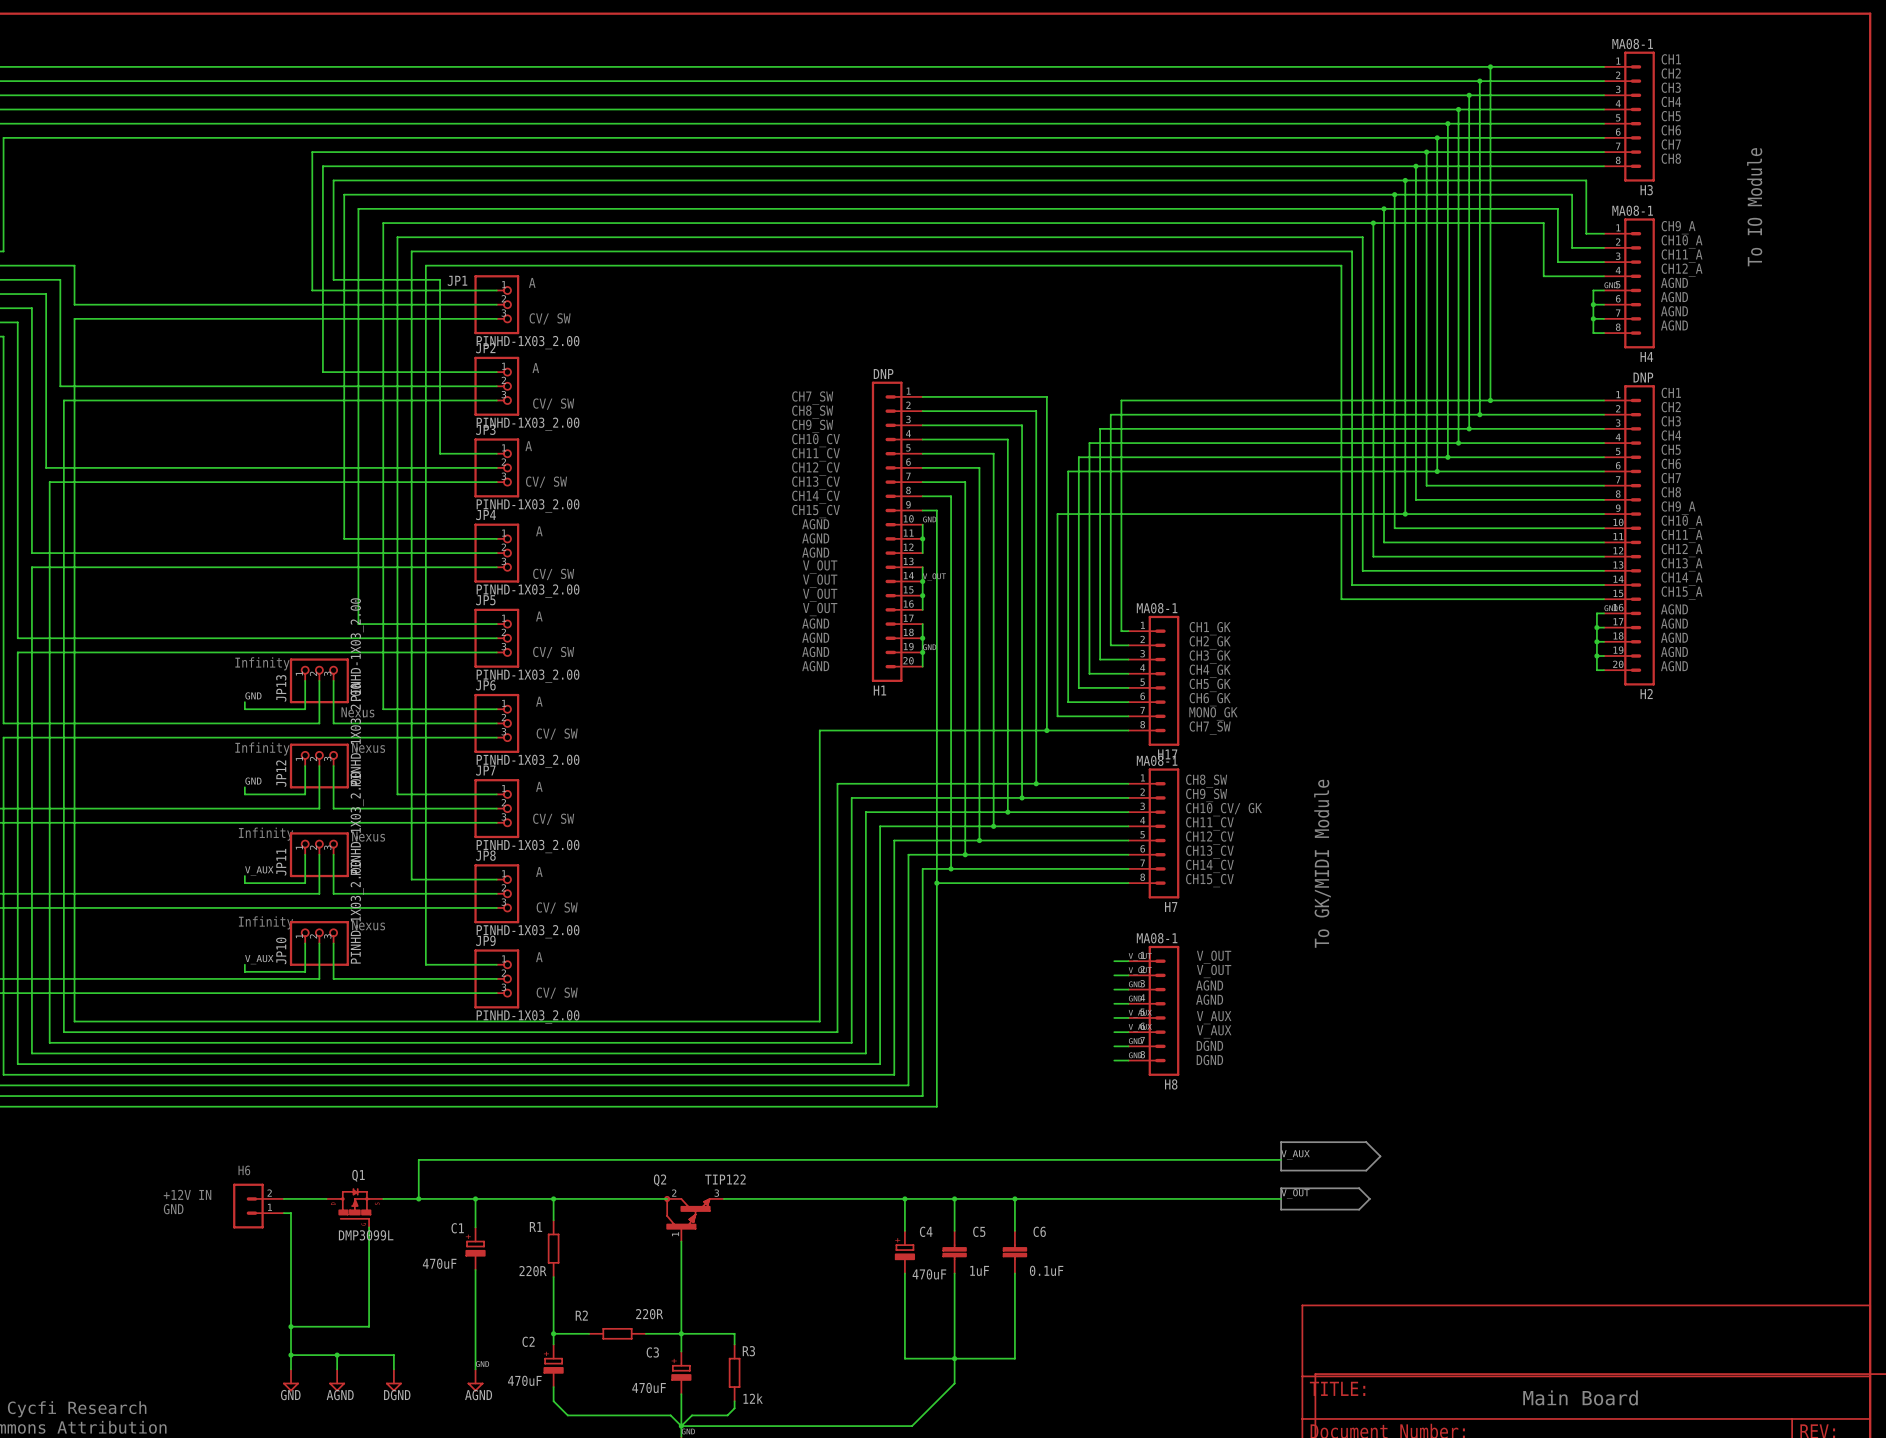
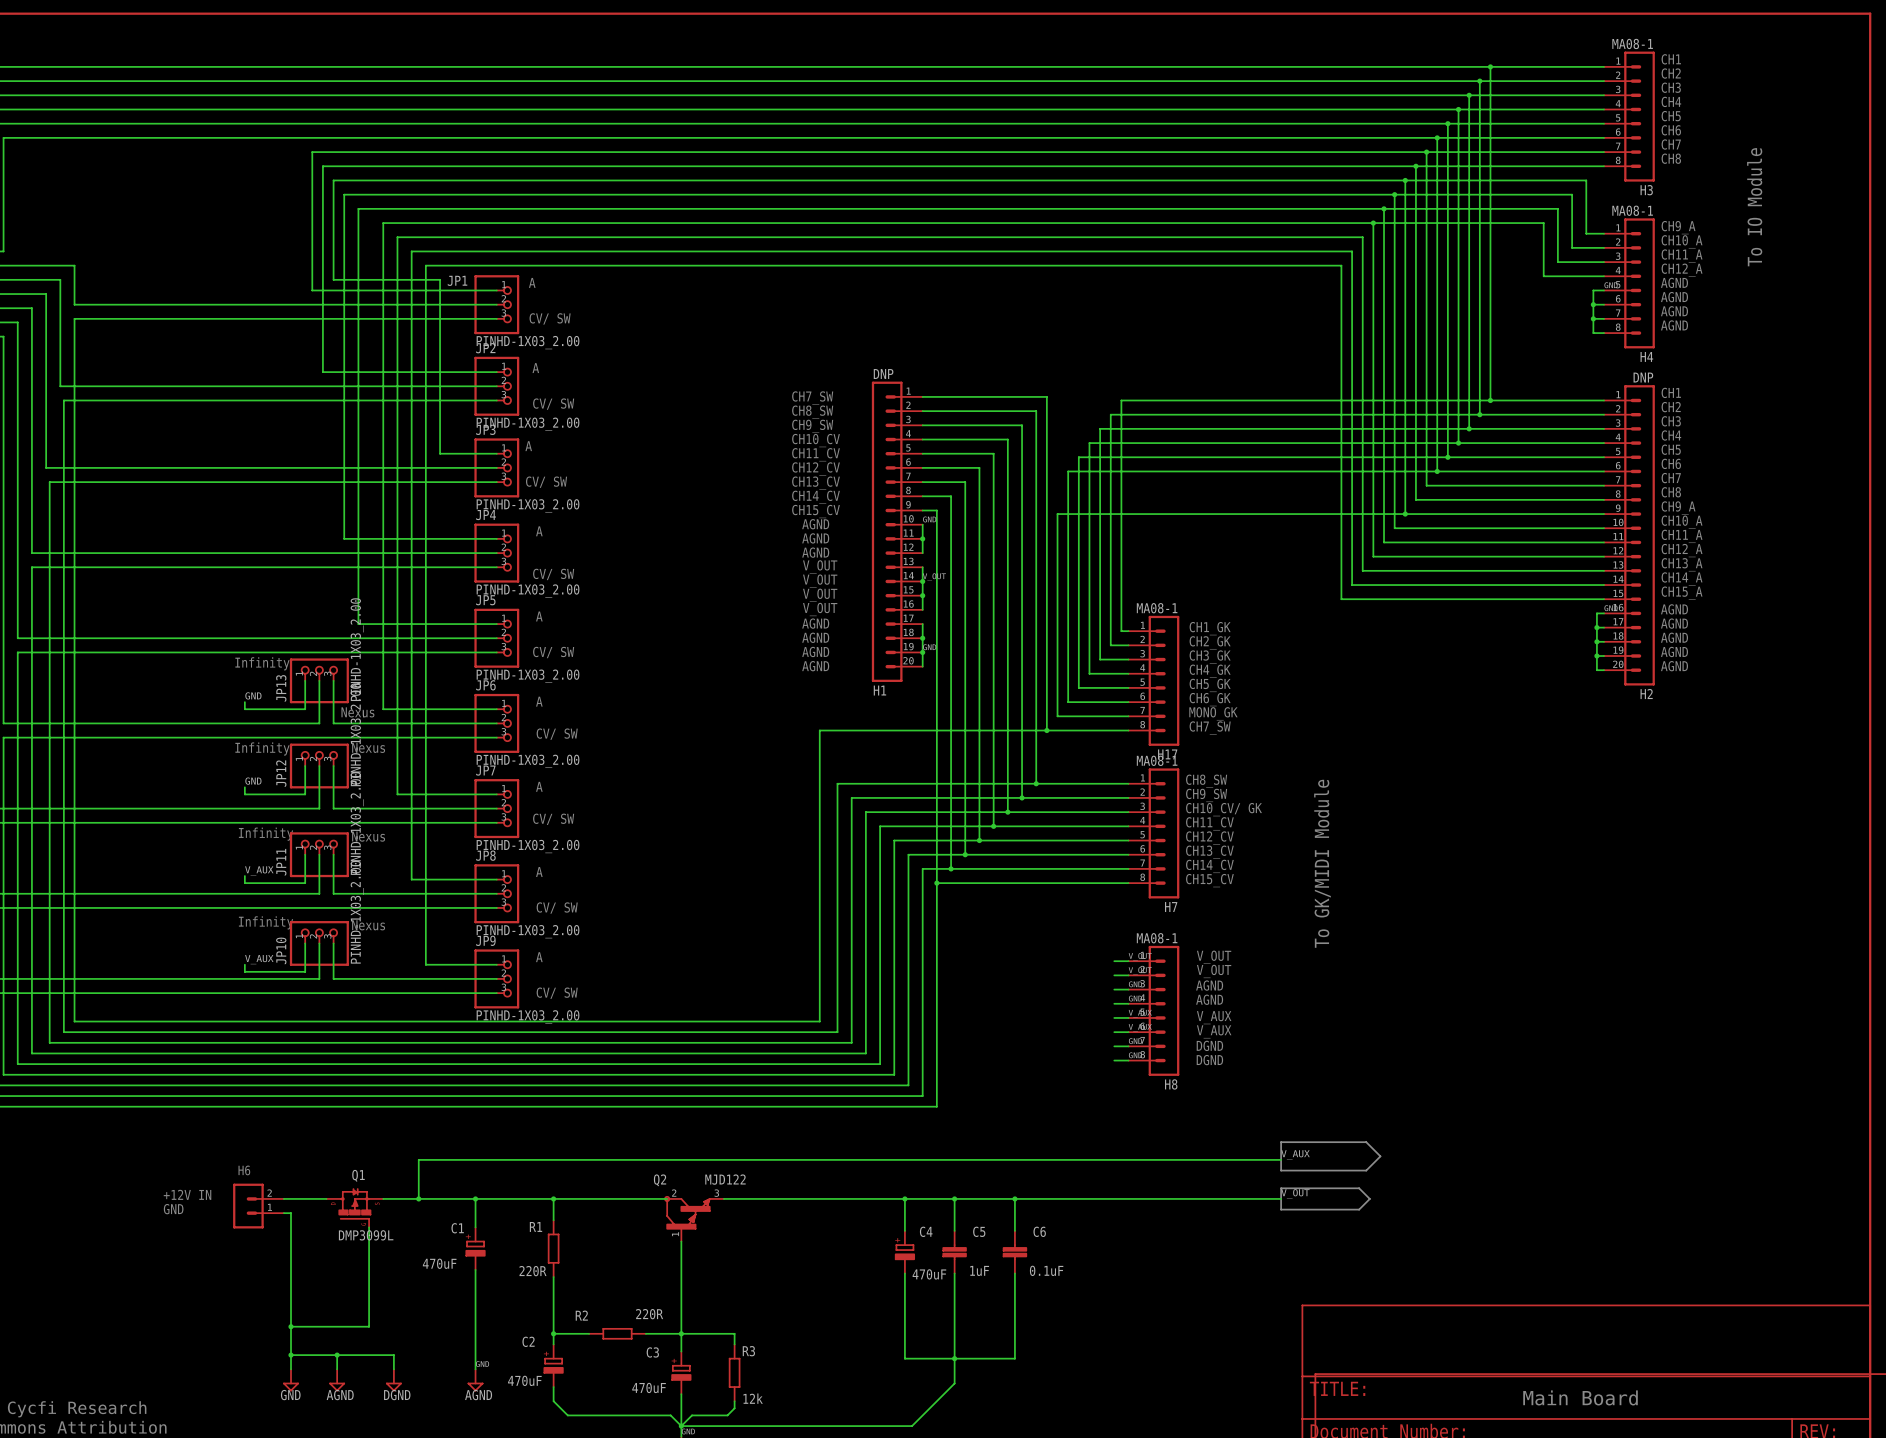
Q2 value: TIP122 (725, 1179) -> MJD122 (725, 1179)

